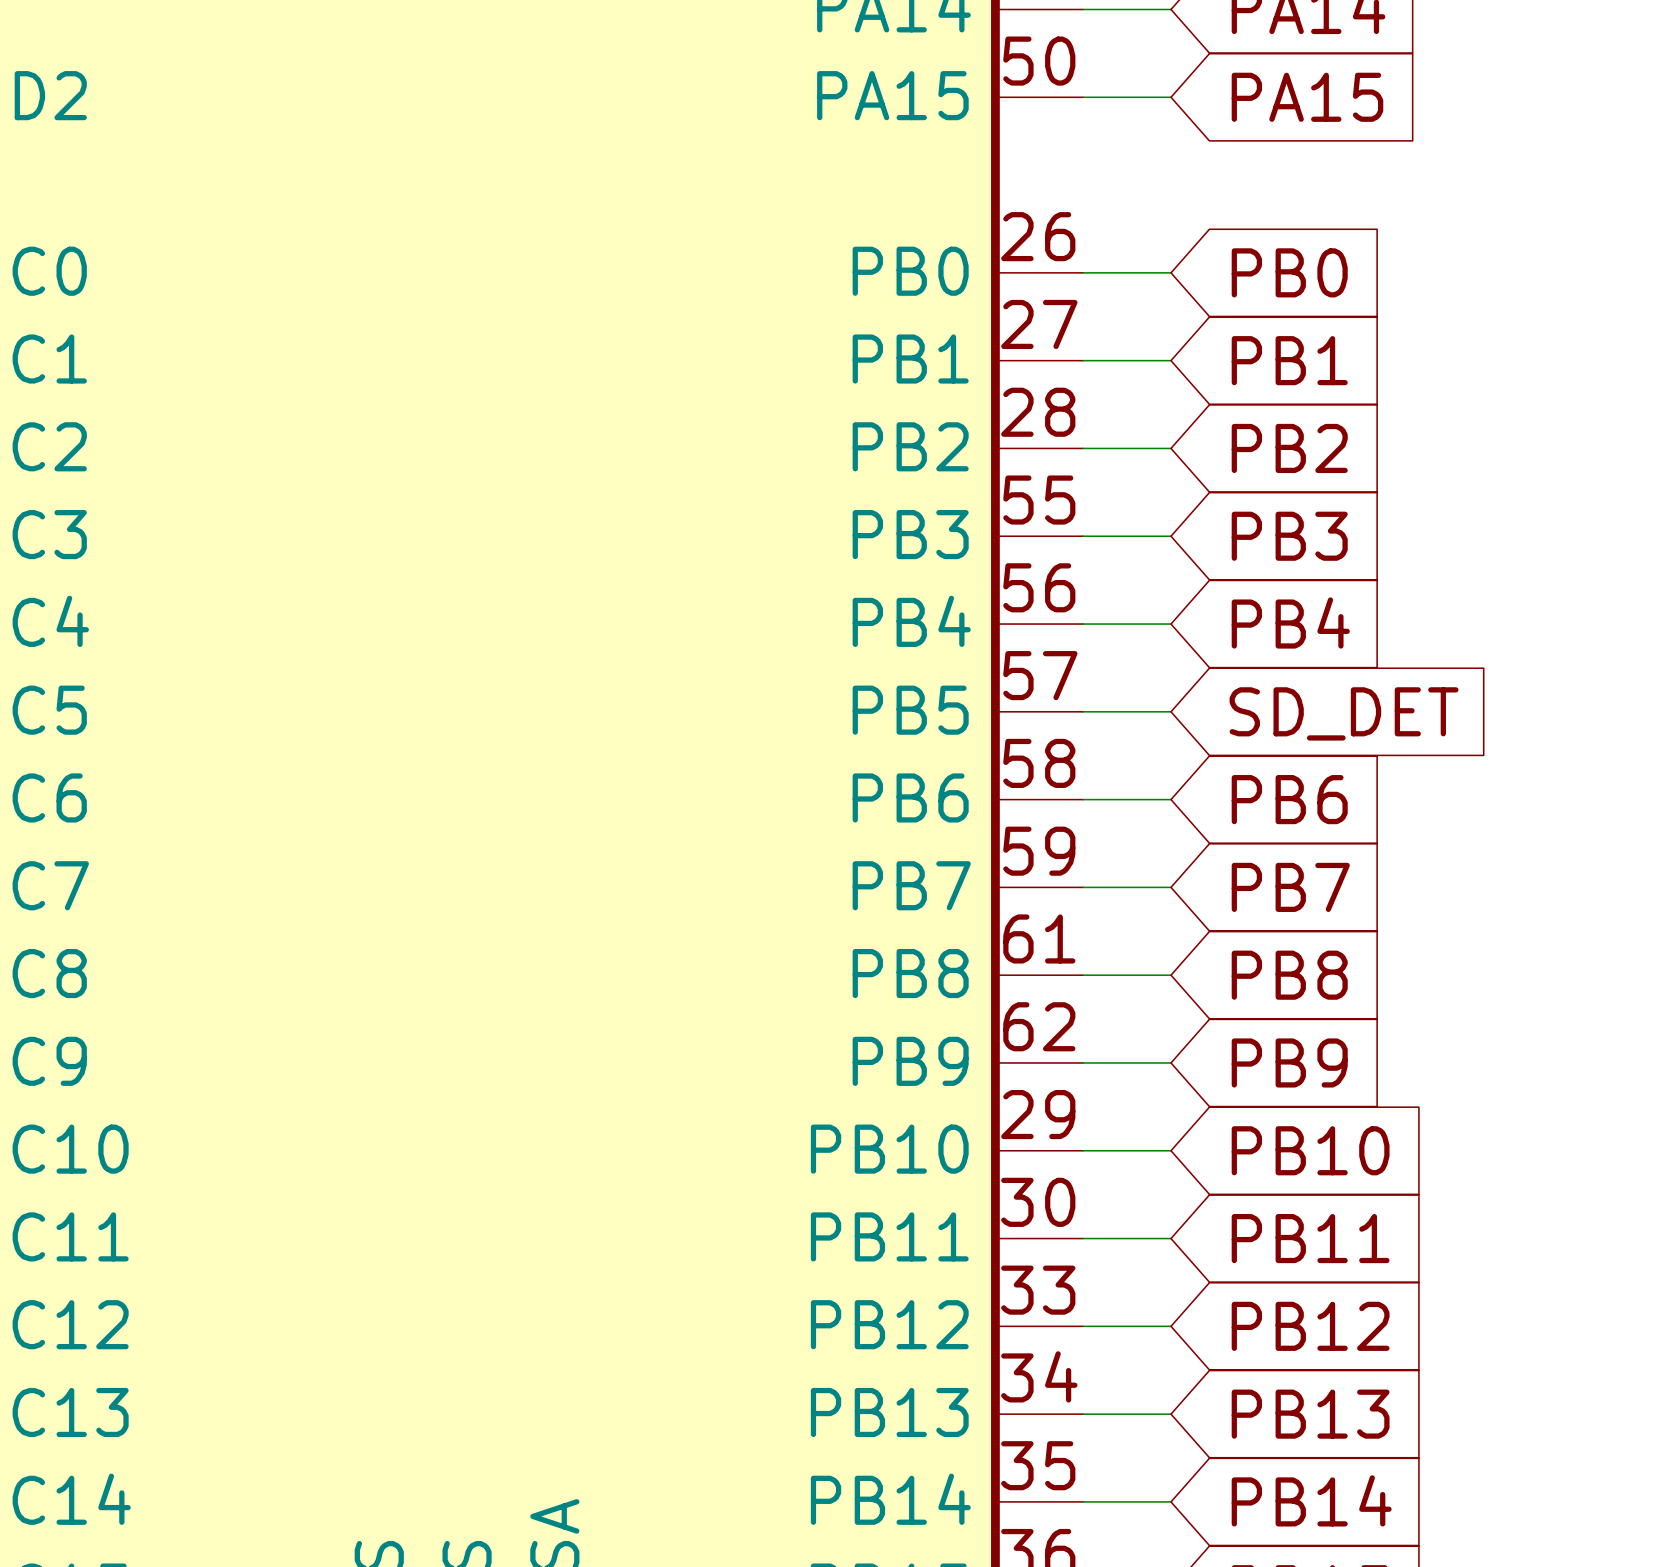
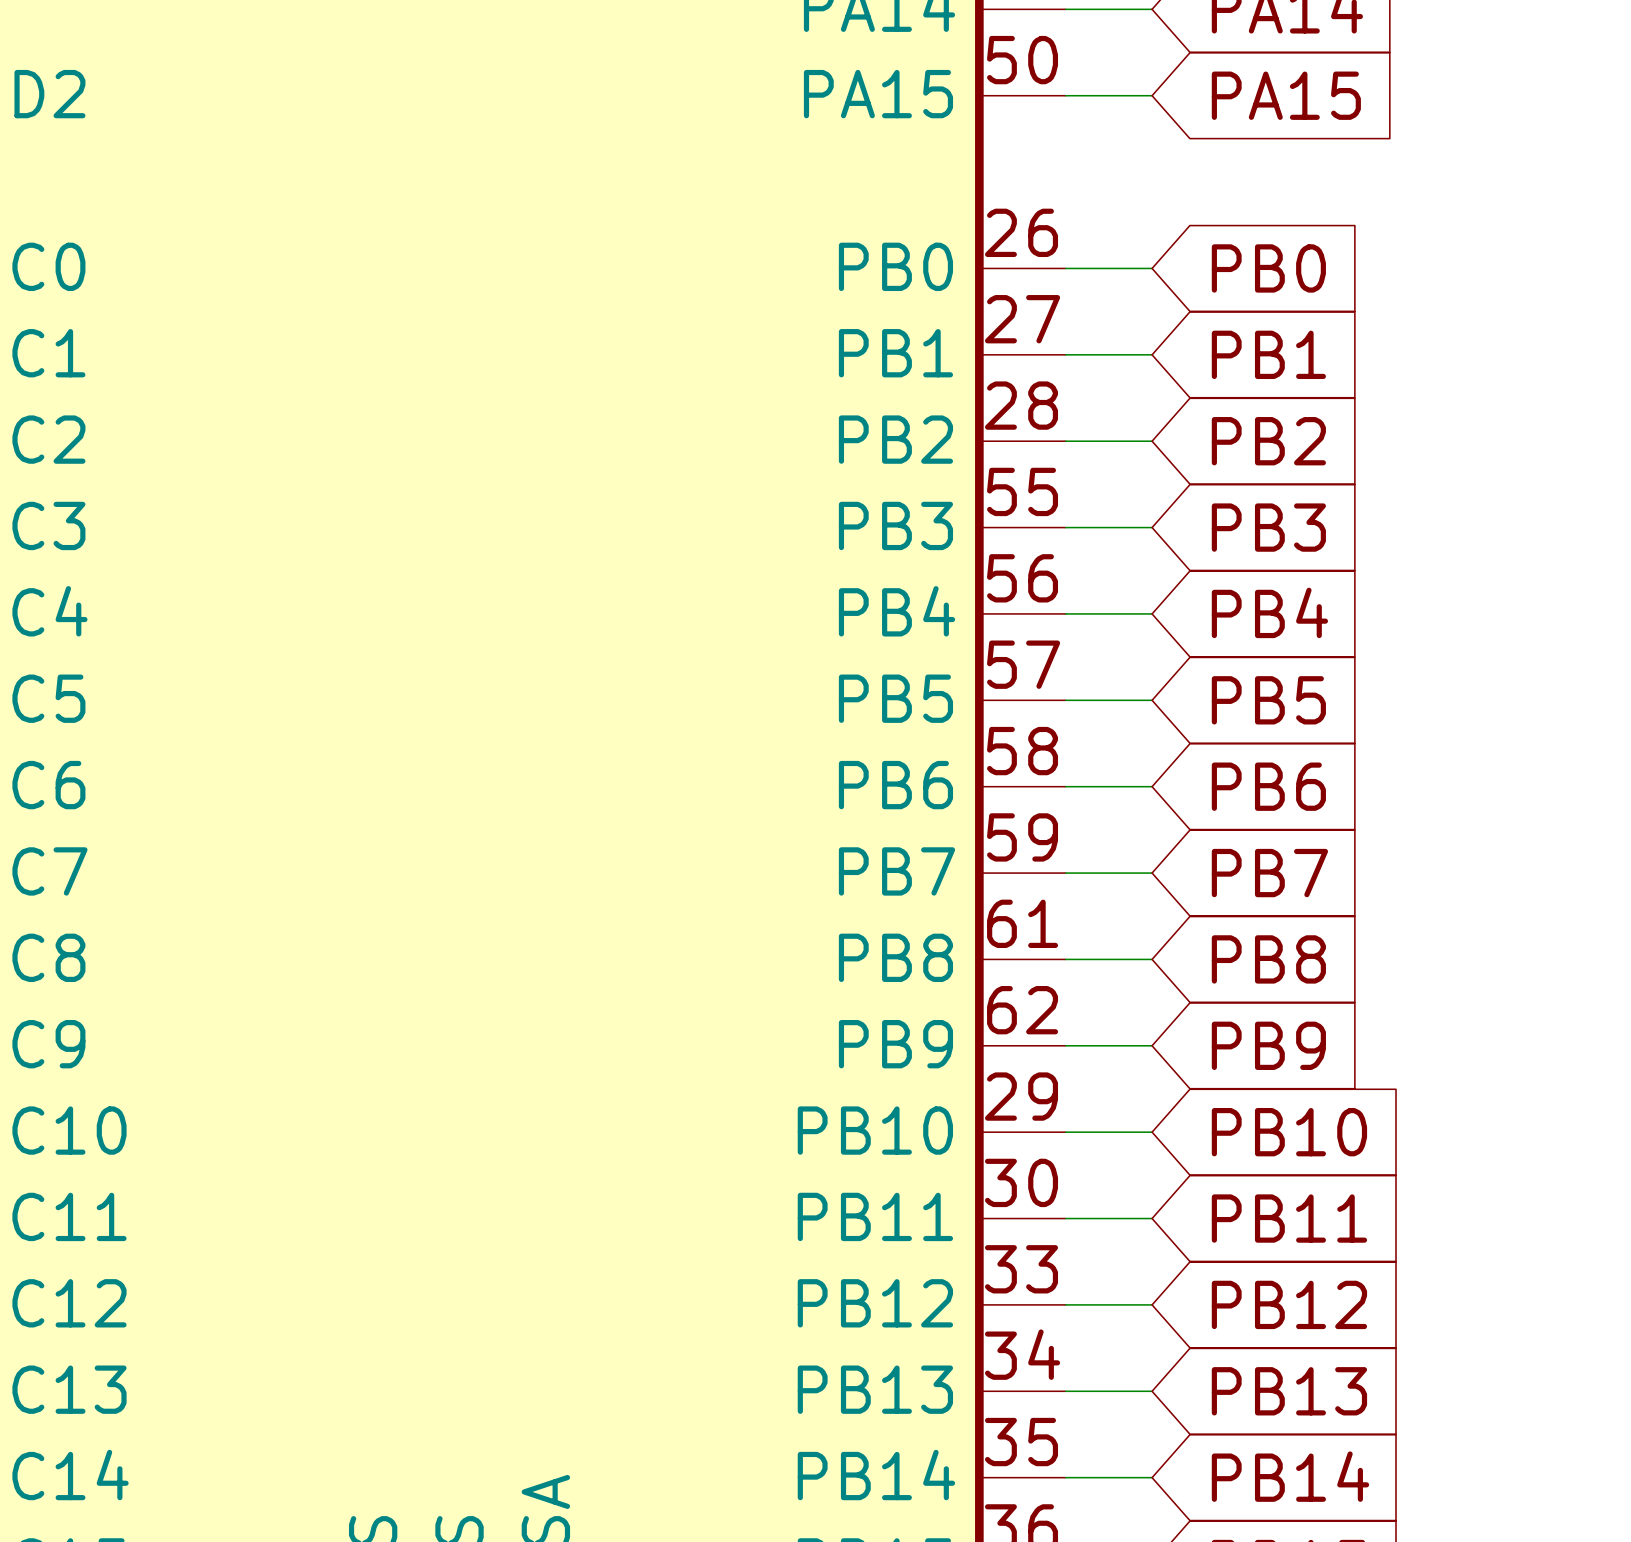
global label: SD_DET (1344, 713) -> PB5 (1268, 700)

